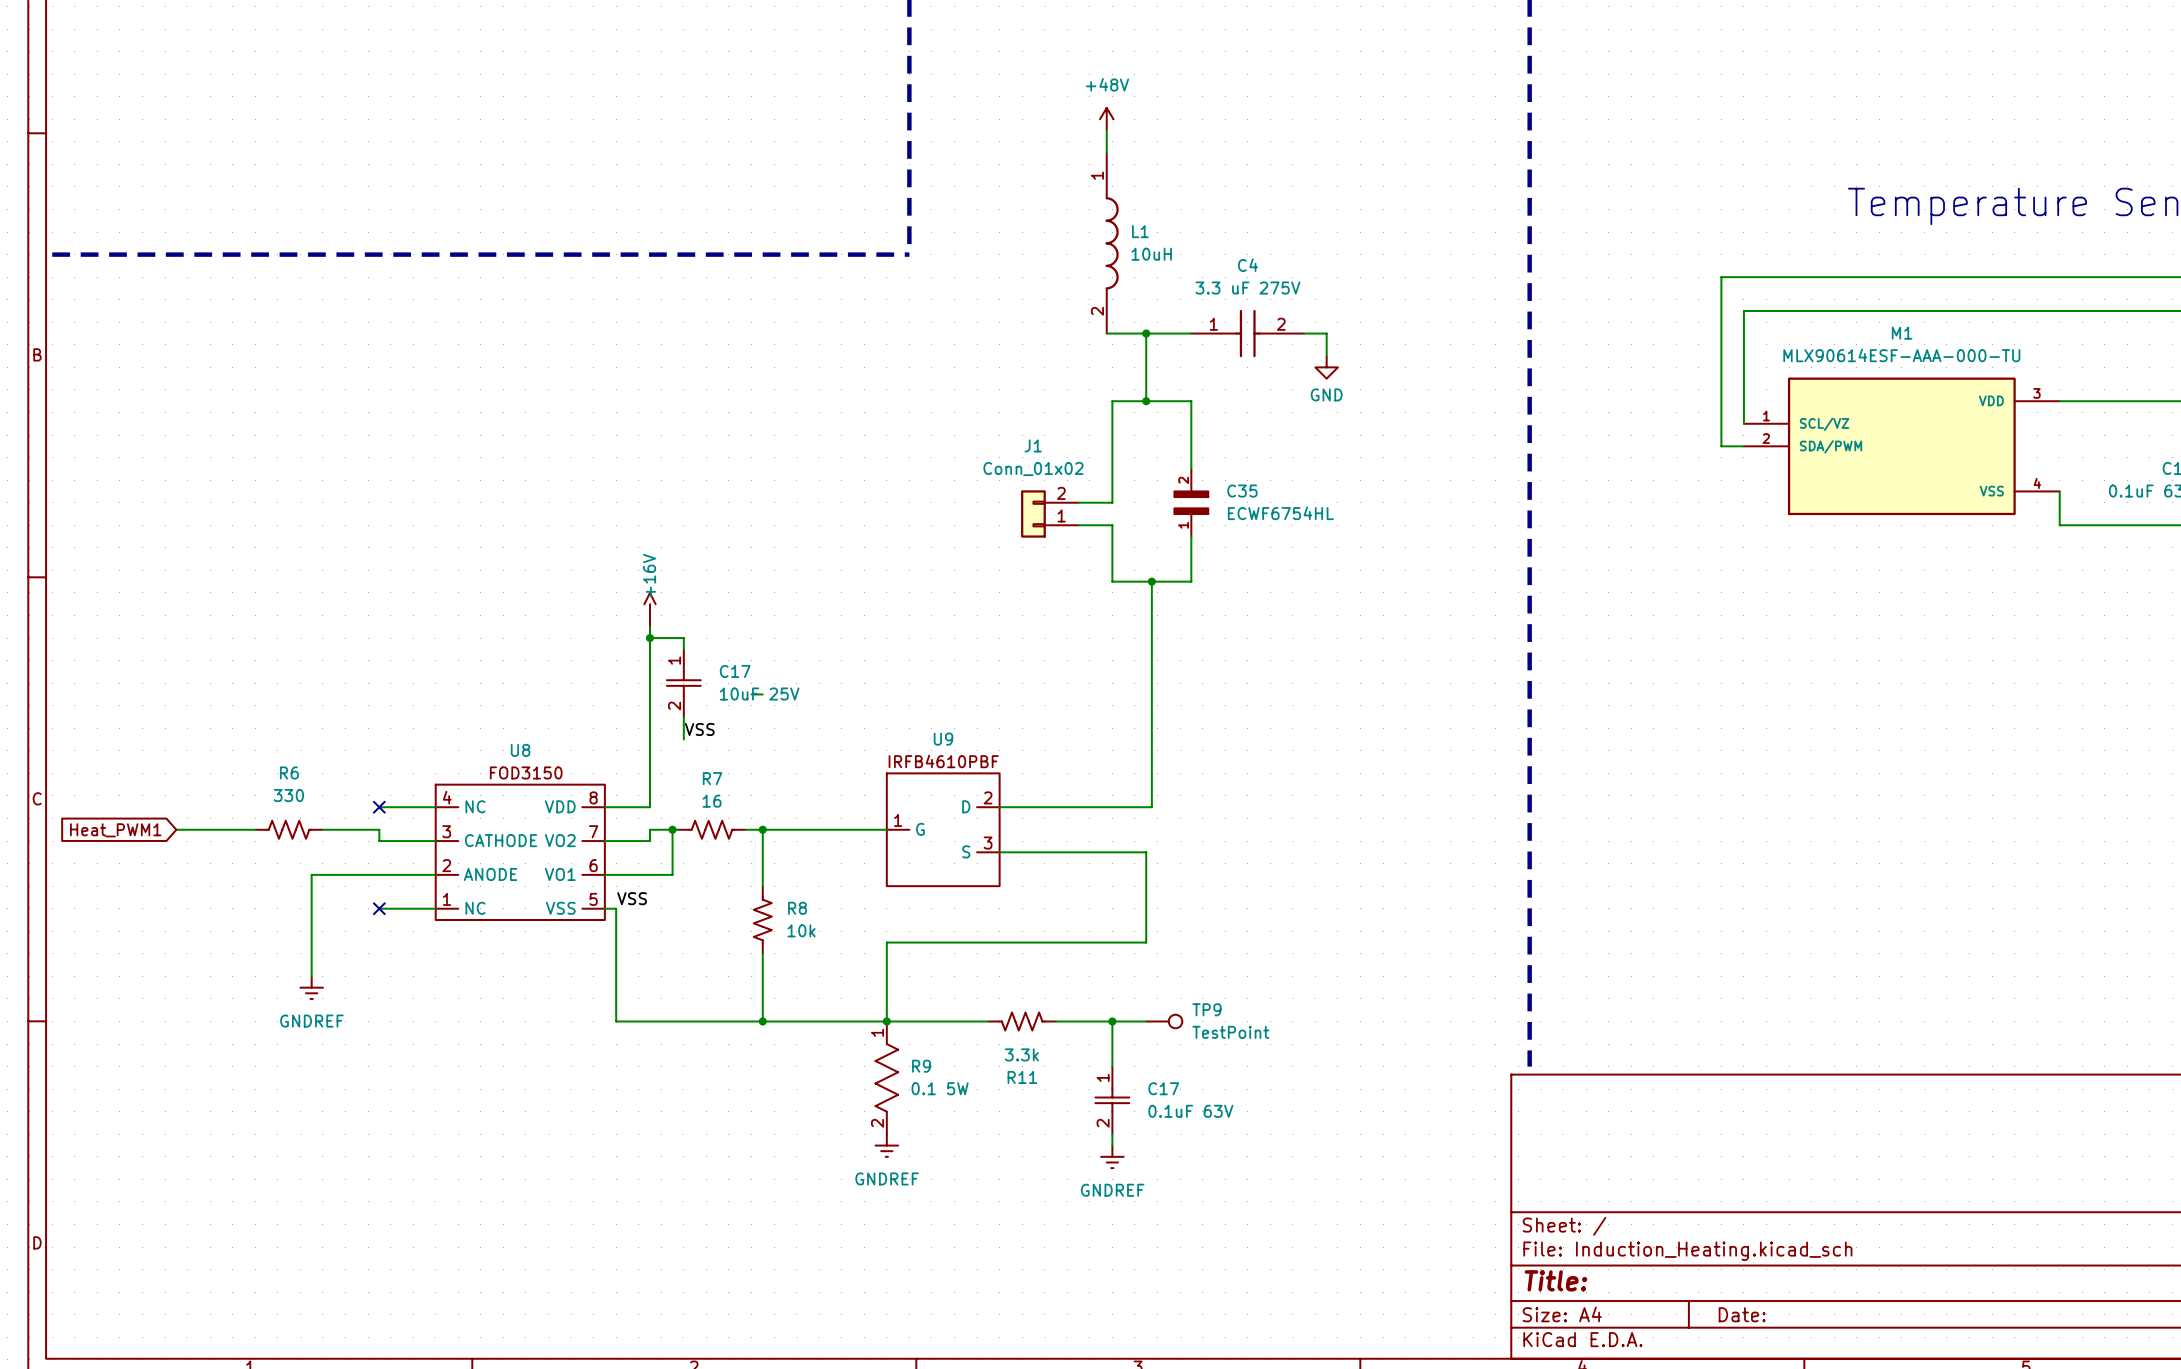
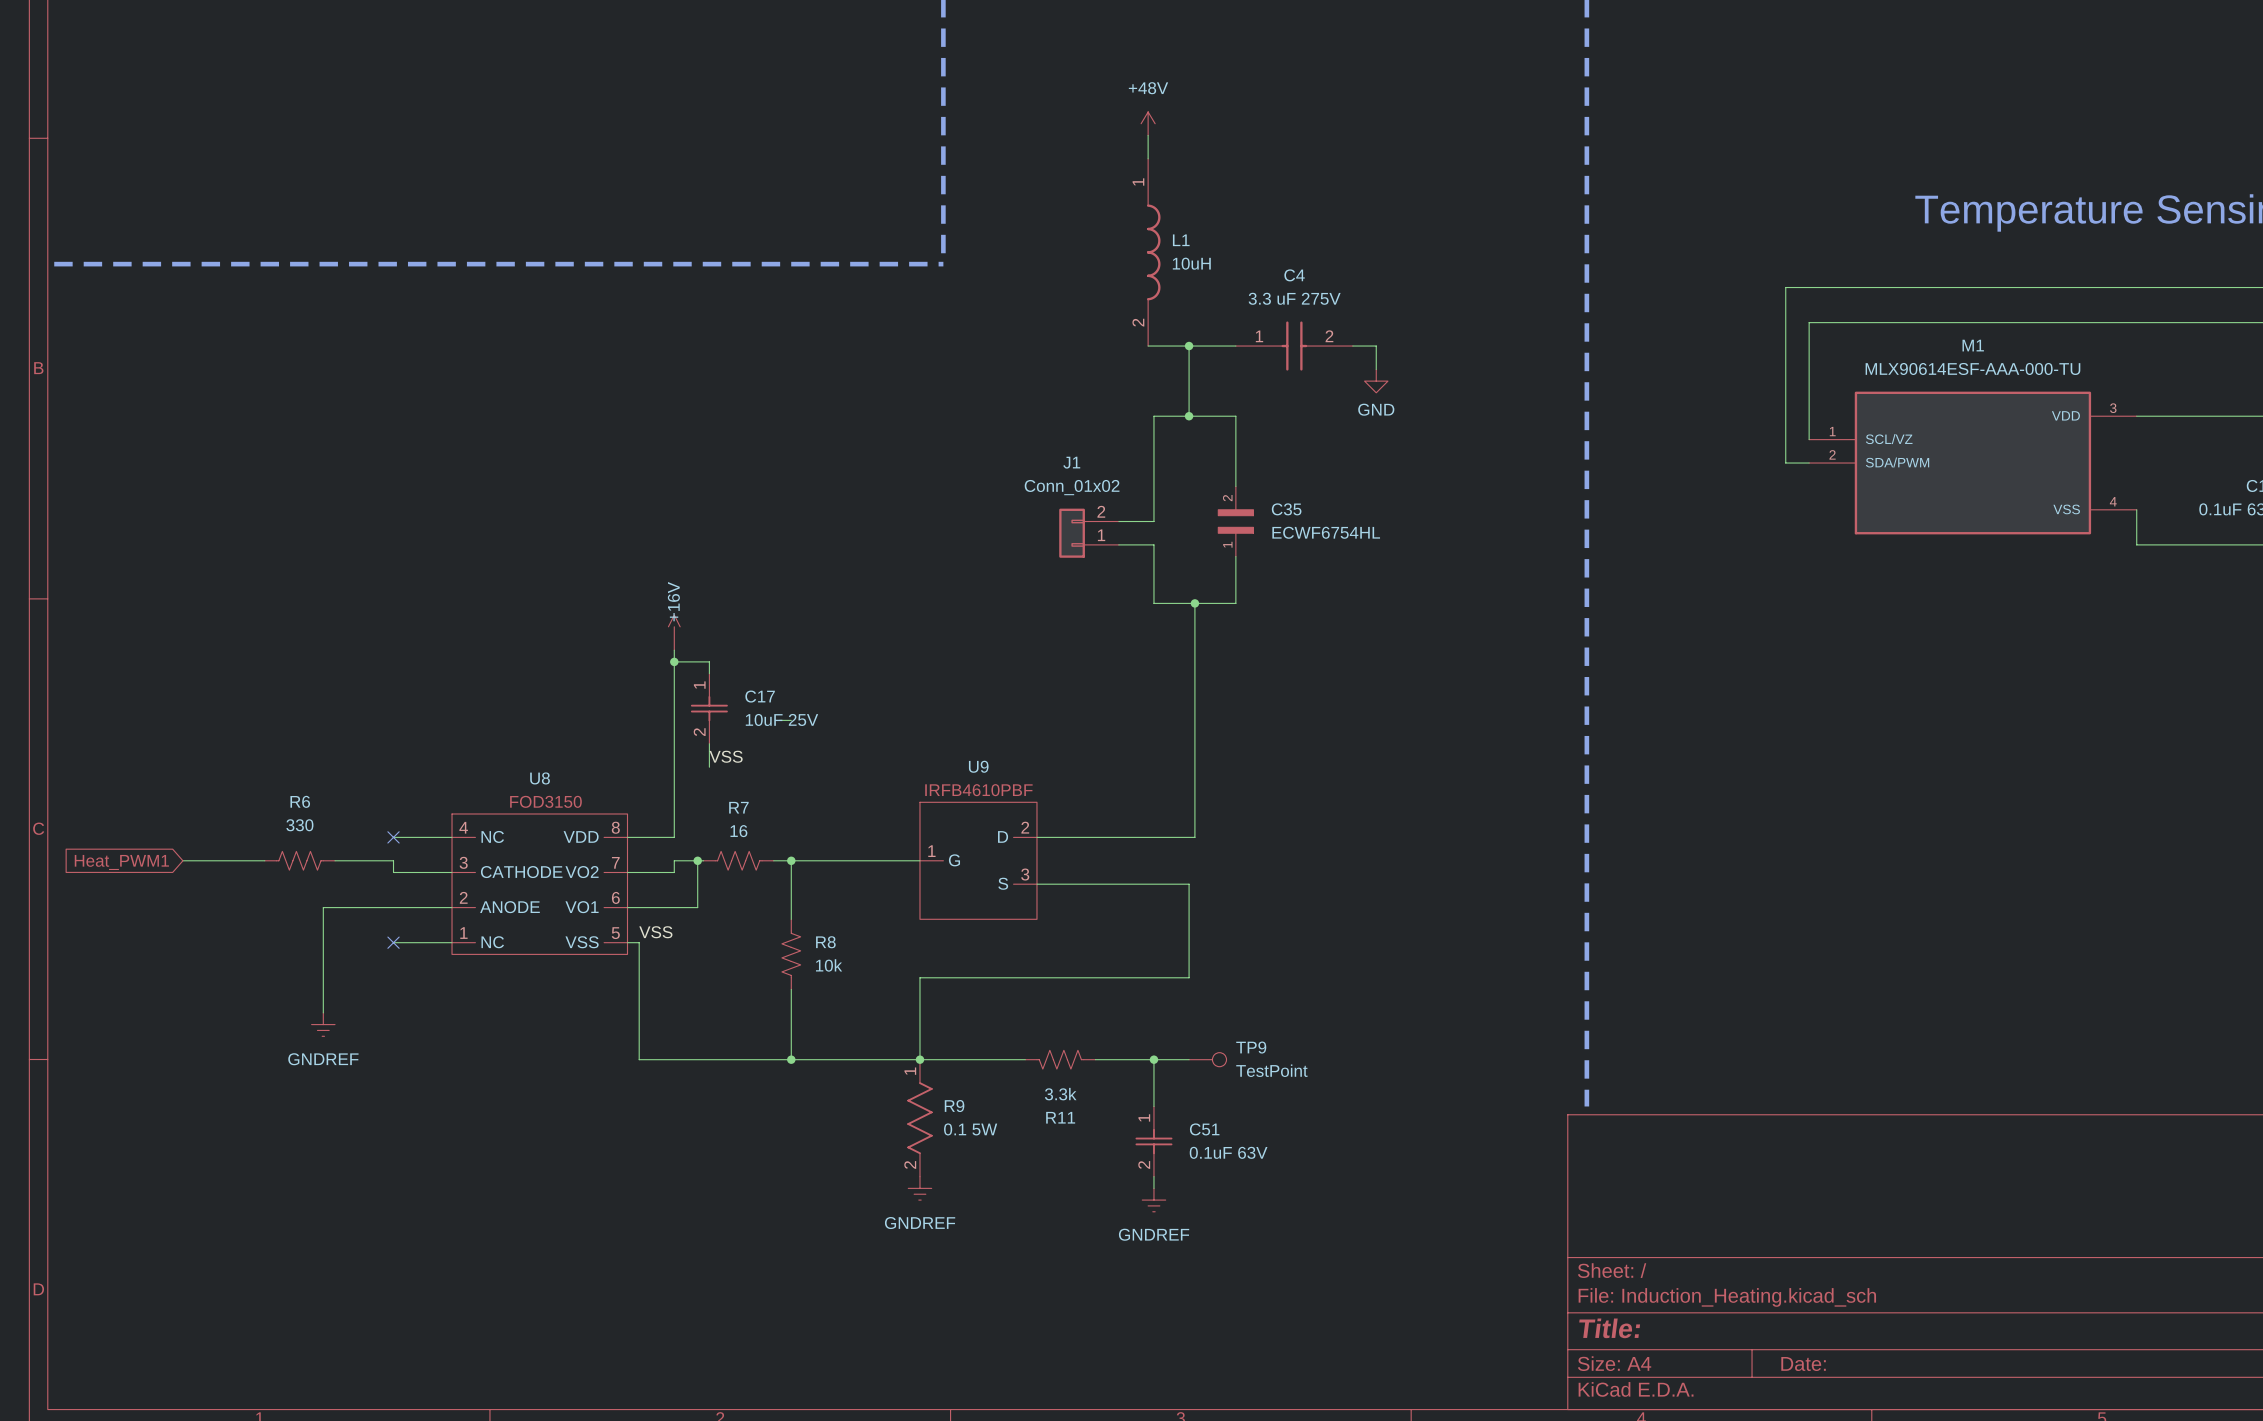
C17 name: C17 (1163, 1088) -> C51 (1204, 1129)

